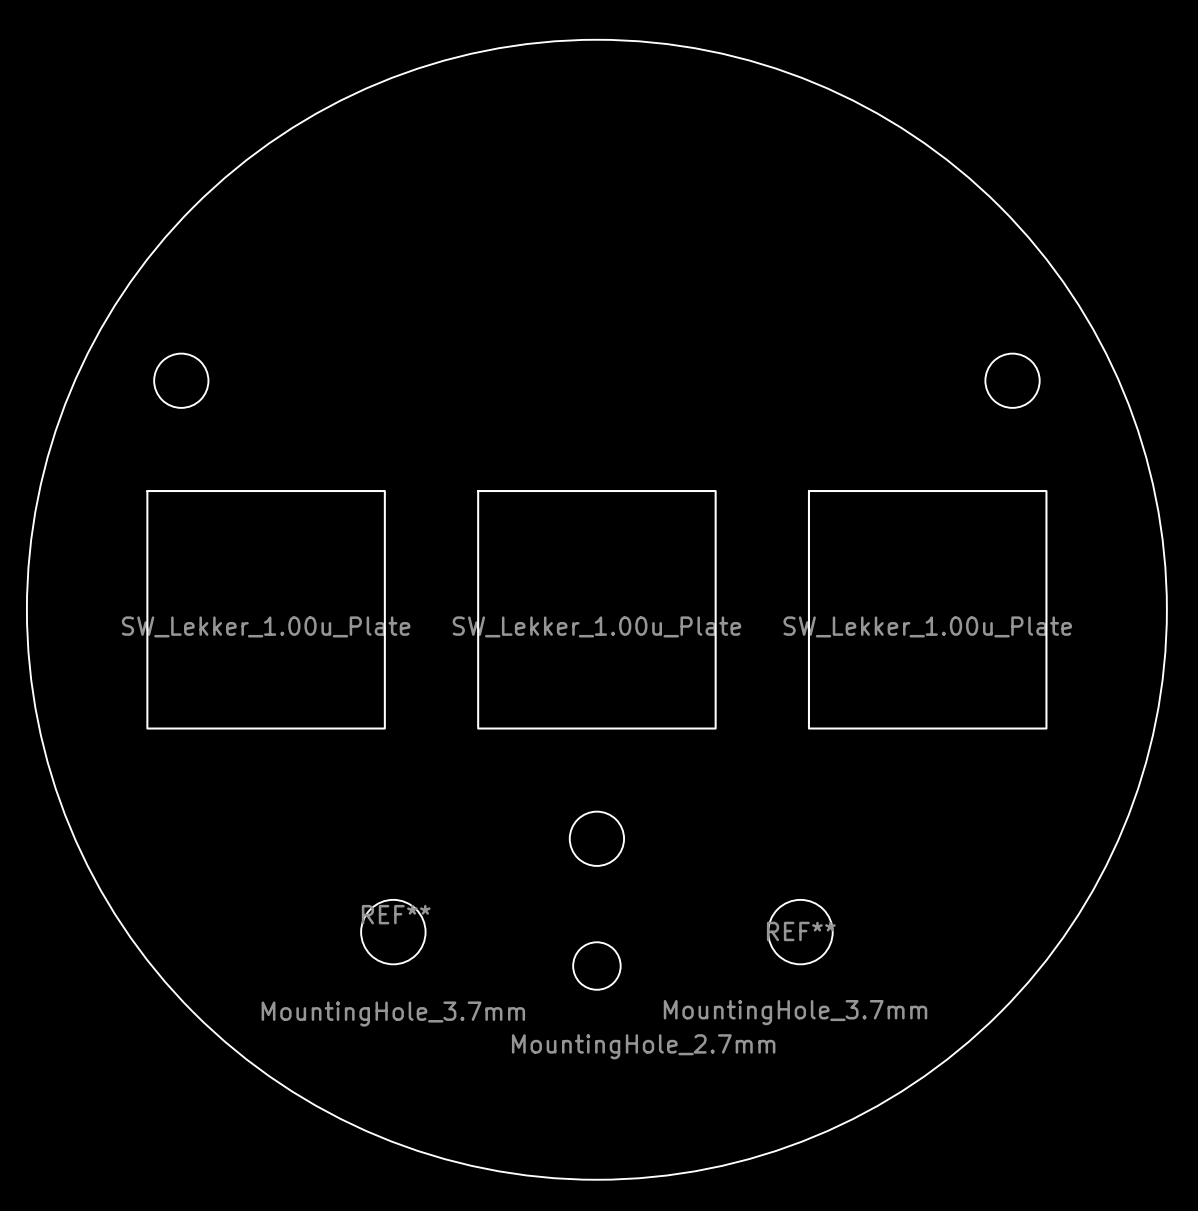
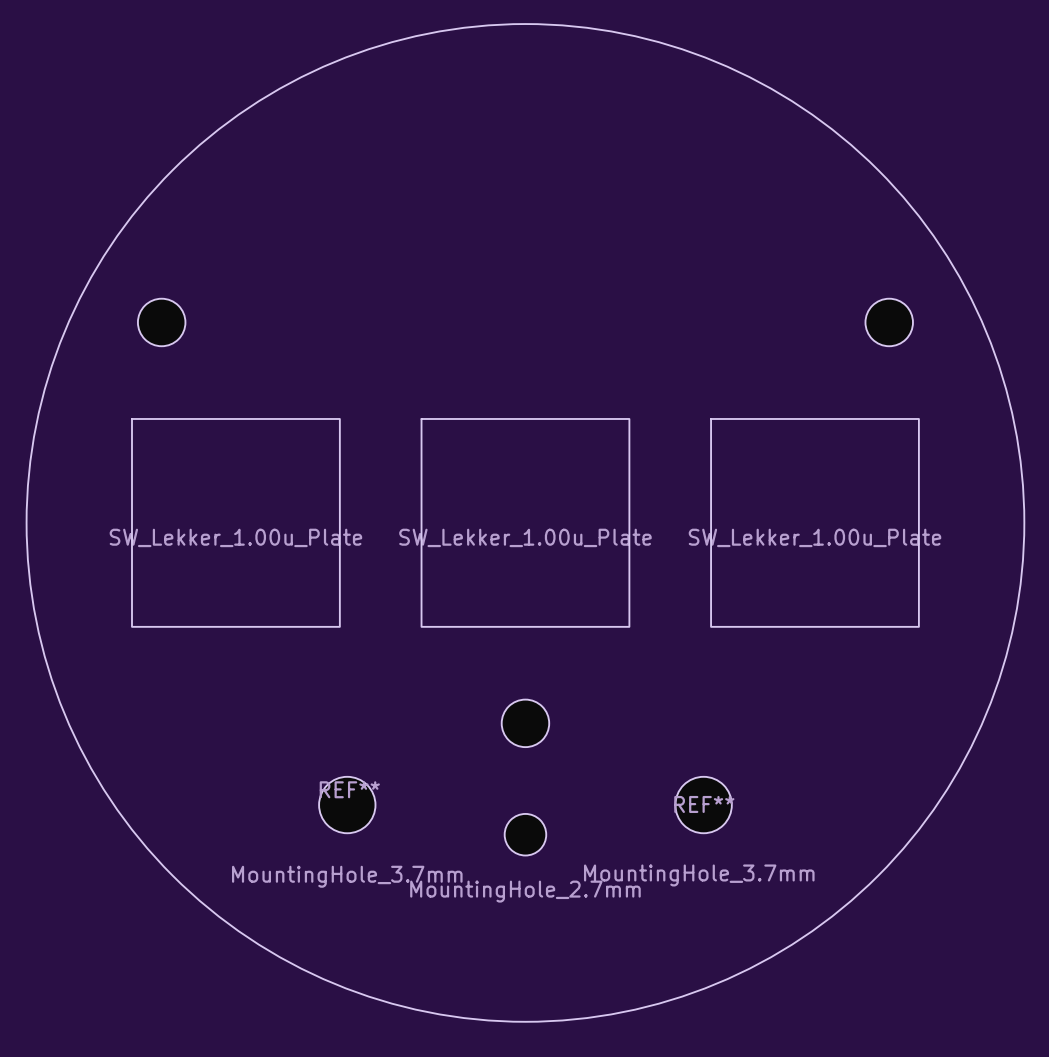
part value position: MountingHole_2.7mm (643, 1046) -> MountingHole_2.7mm (525, 891)

